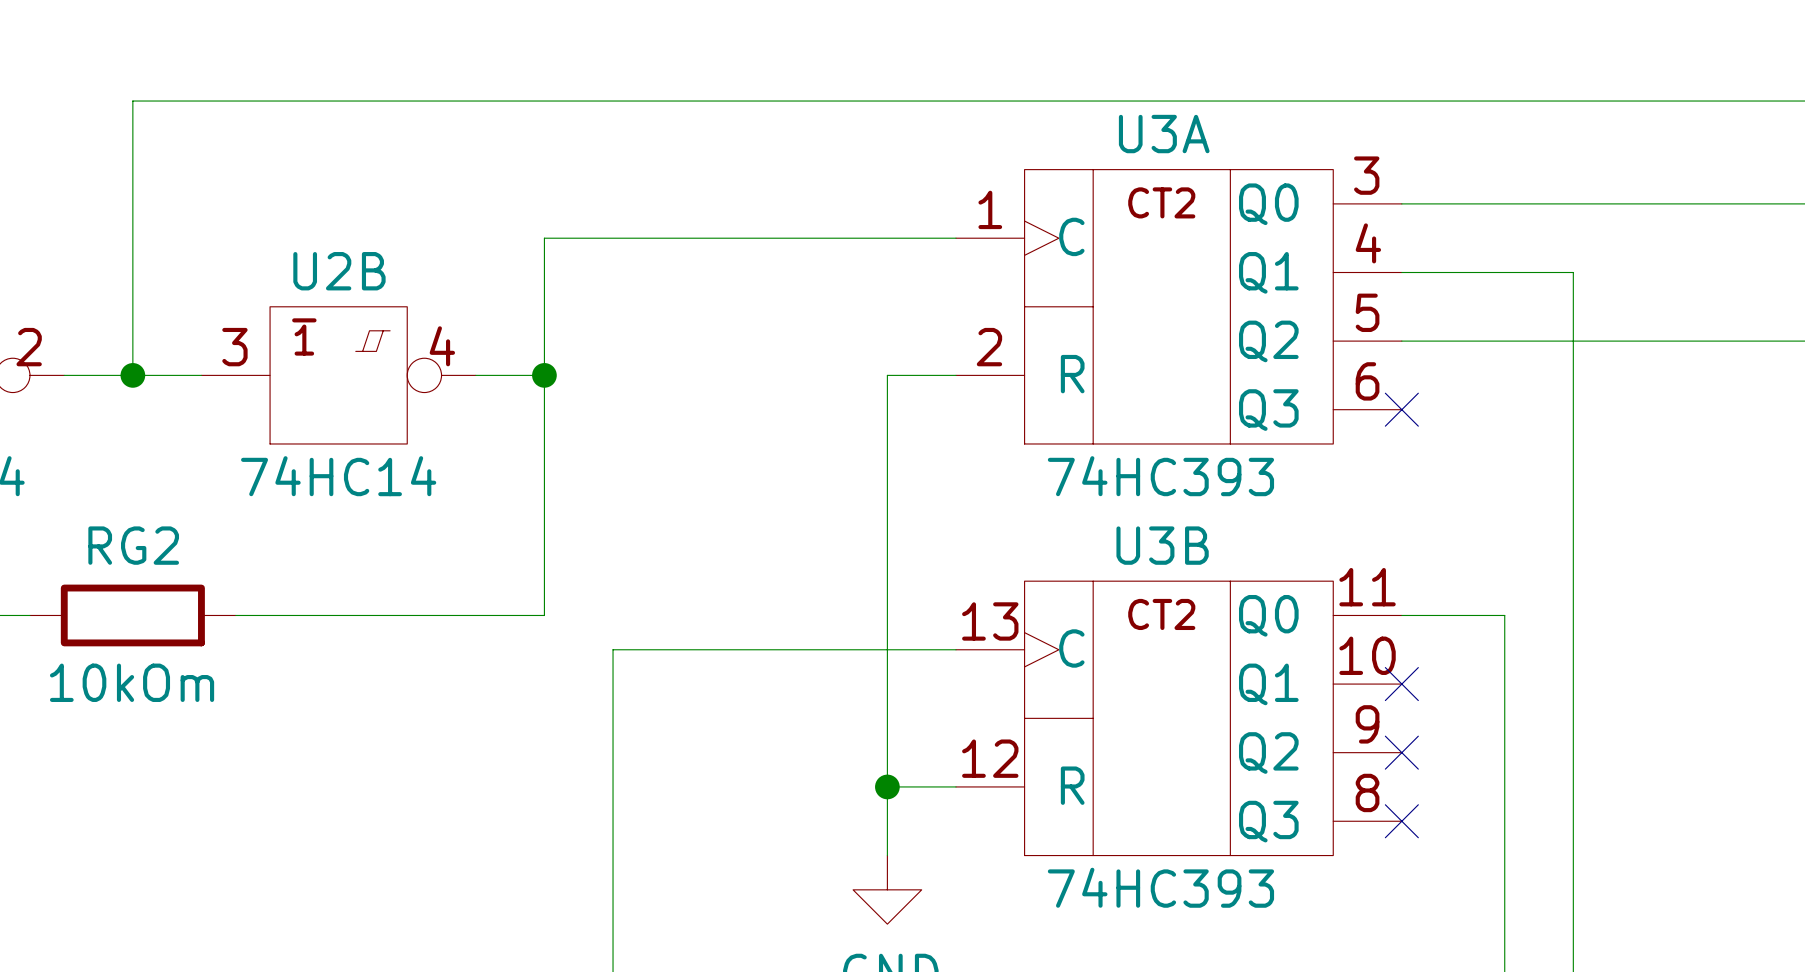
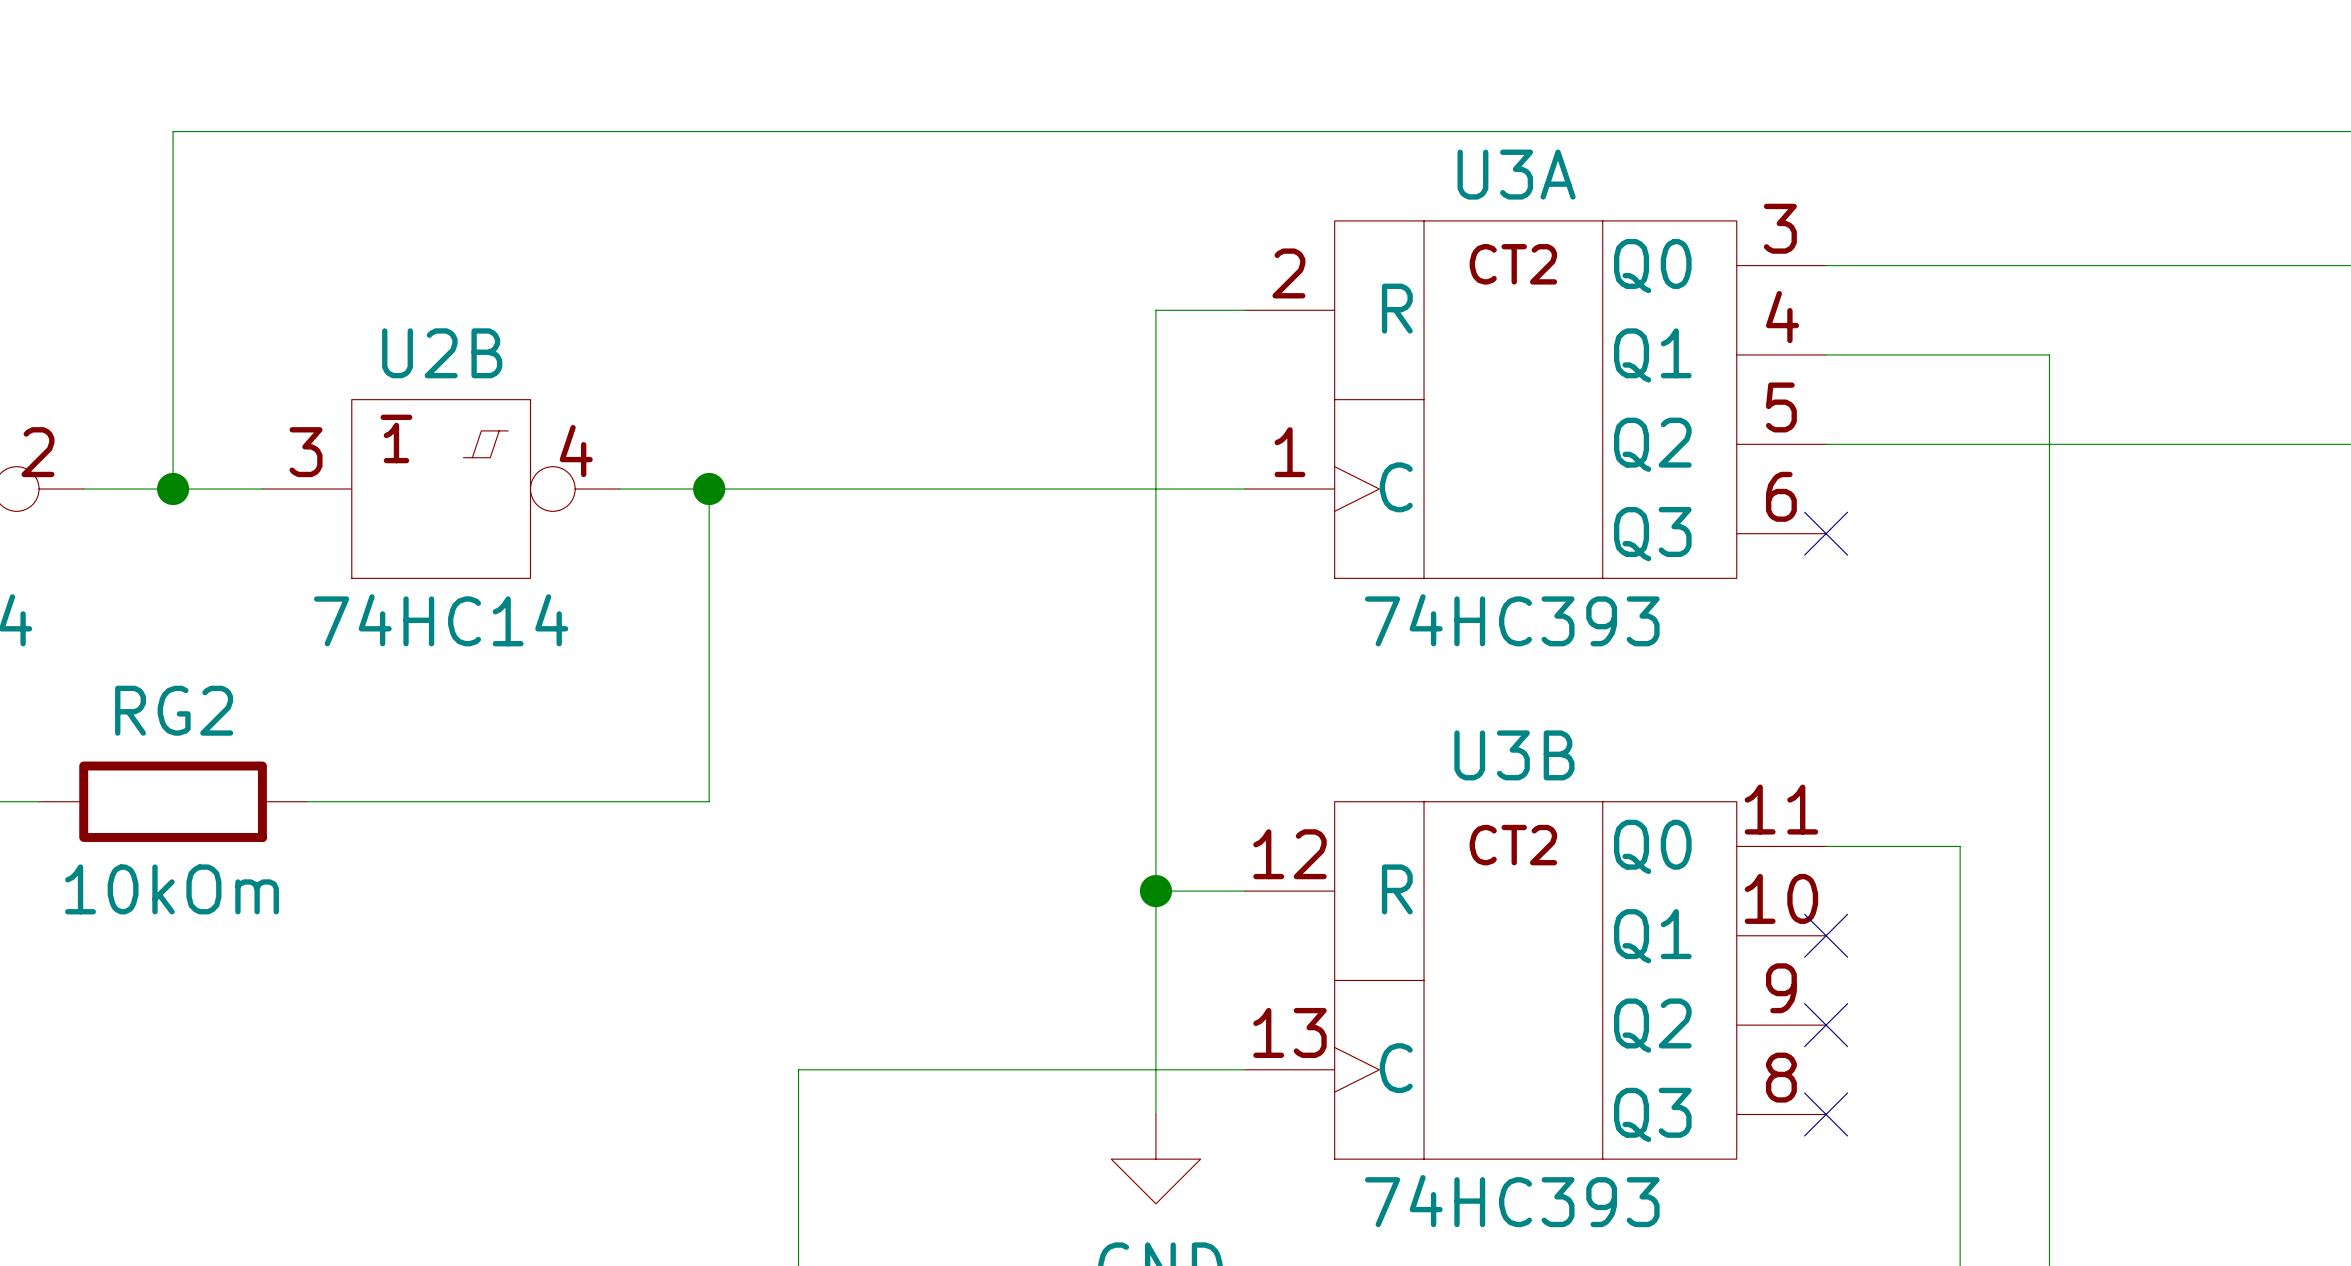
U3A symbol: [955, 169, 1402, 444] -> [1245, 220, 1827, 579]
wire: (887, 238) (544, 238) (544, 375) -> (1155, 310) (1155, 489) (709, 489)
U3B symbol: [955, 581, 1402, 856] -> [1245, 801, 1827, 1160]
wire: (1401, 615) (1504, 615) (1504, 649) -> (1826, 846) (1960, 846)
wire: (955, 649) (613, 649) (613, 821) -> (1245, 1069) (798, 1069)
no-connect mark: (1401, 684) -> none
no-connect mark: none -> (1826, 935)
no-connect mark: (1401, 752) -> none
wire: (887, 786) (955, 786) -> (1155, 891) (1245, 891)
junction position: (887, 786) -> (1155, 891)
no-connect mark: none -> (1826, 1025)
no-connect mark: (1401, 821) -> none
no-connect mark: none -> (1826, 1114)

